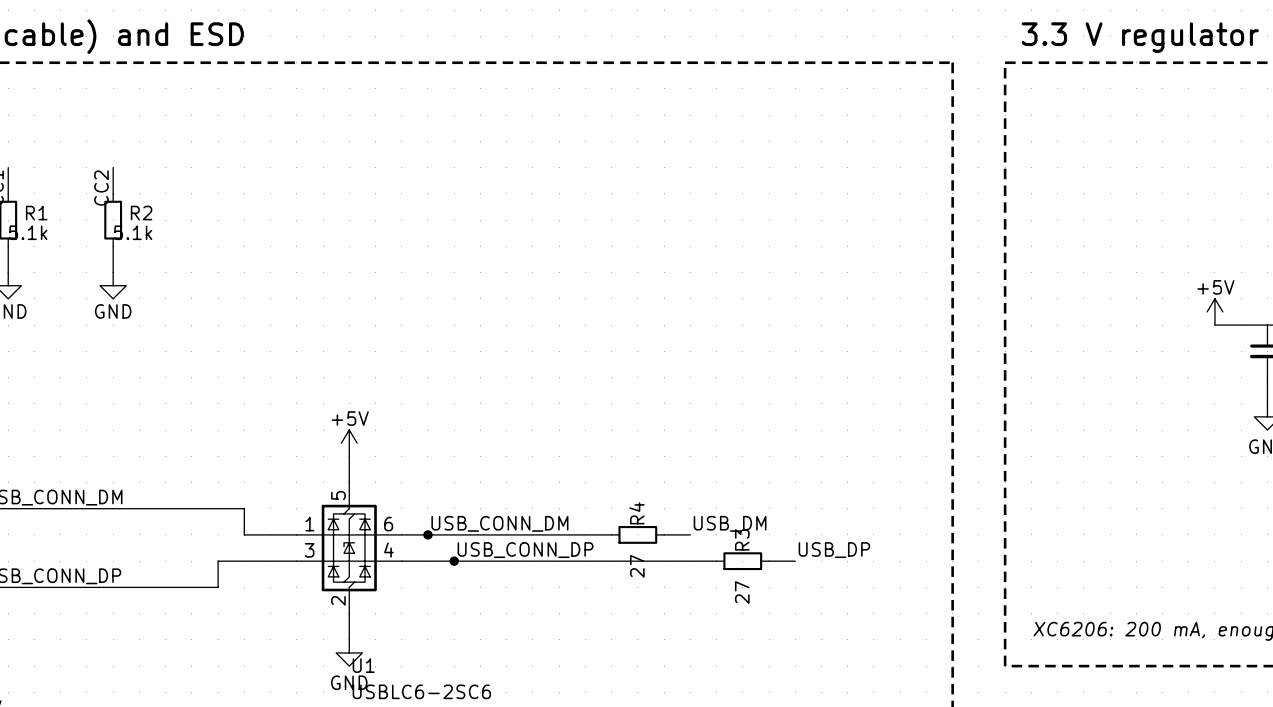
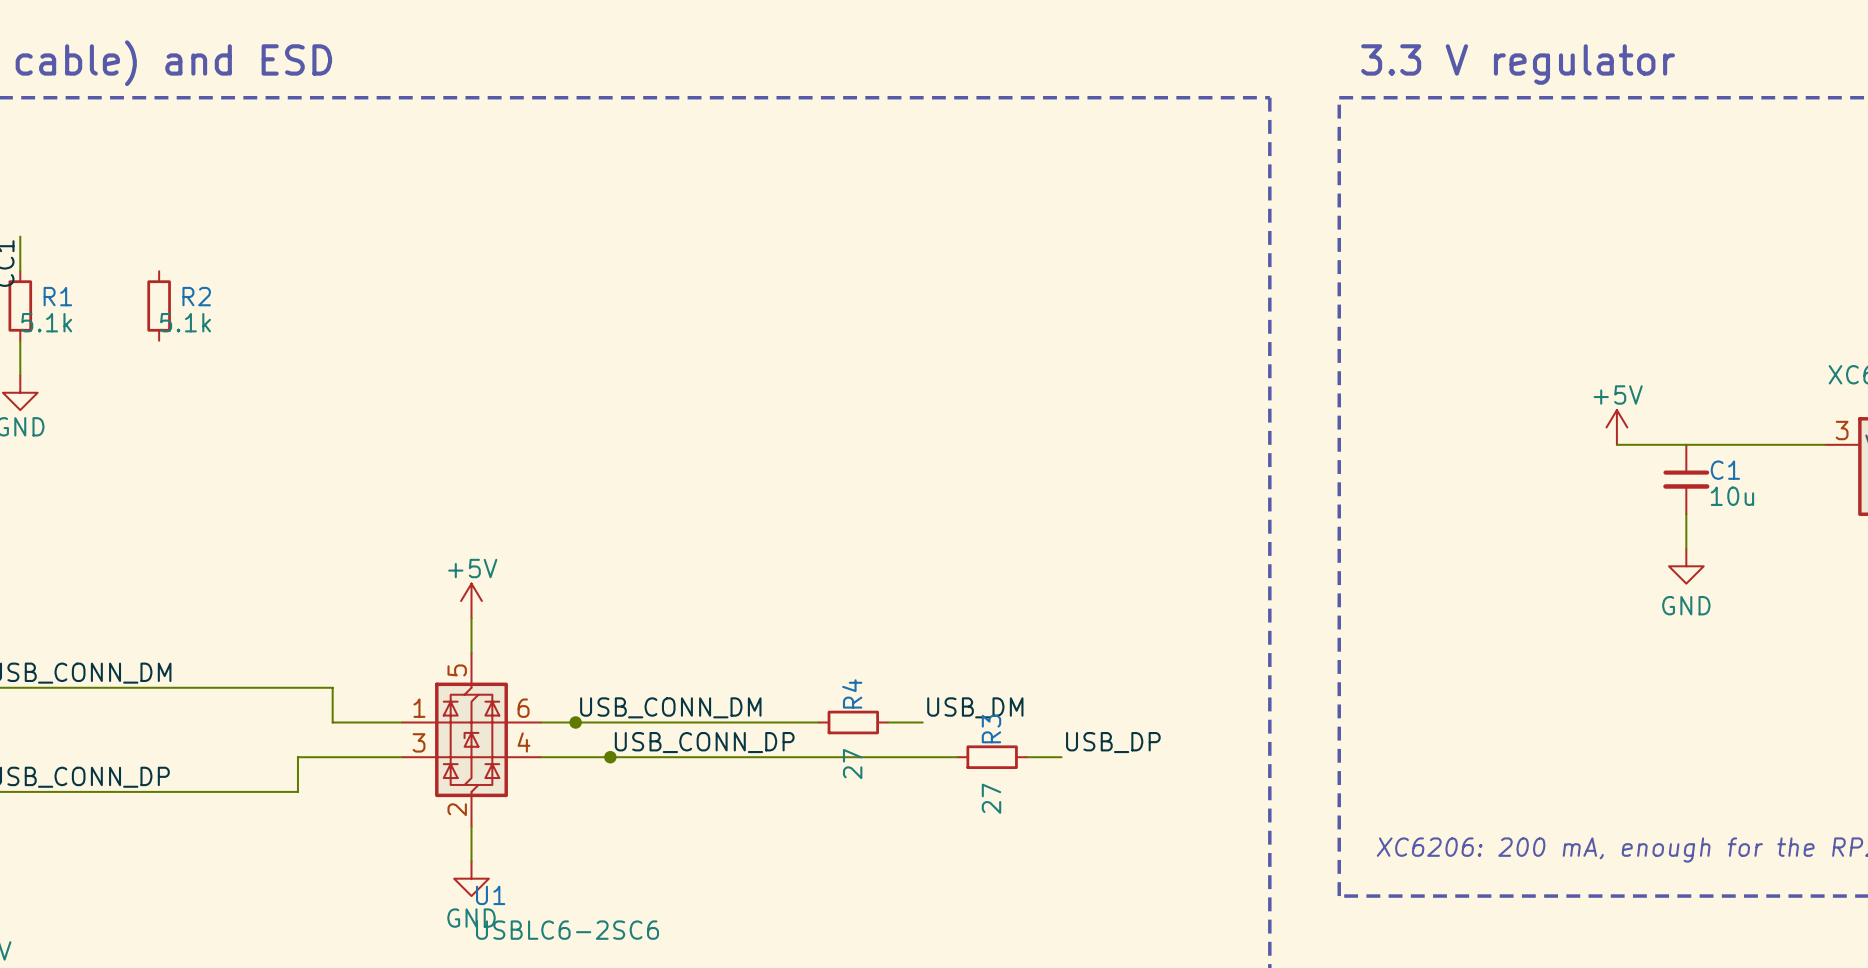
wire: (113, 167) (113, 193) -> none
label: CC2 (101, 188) -> none
wire: (113, 246) (113, 272) -> none
power symbol: GND (113, 285) -> none

